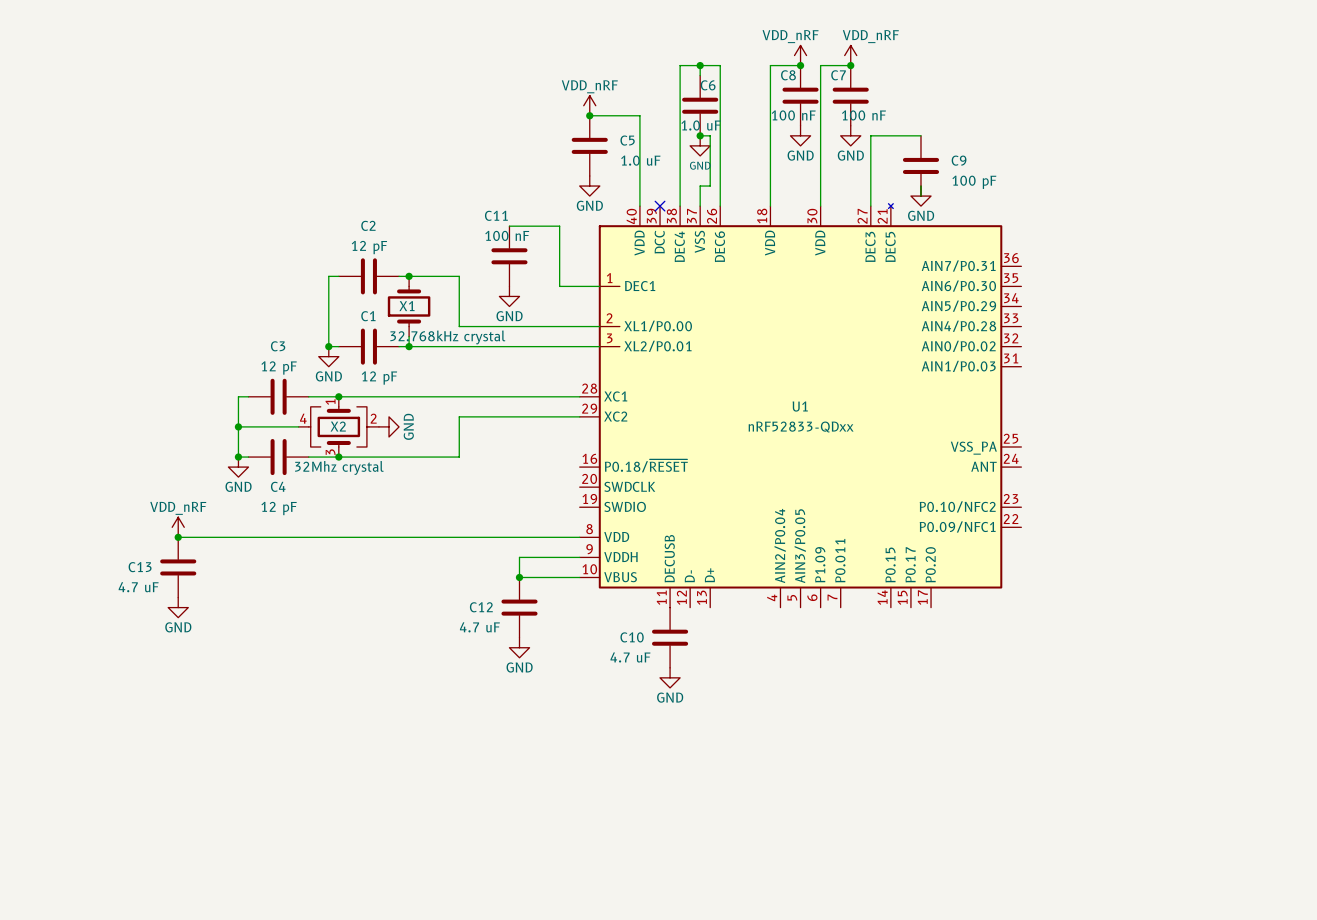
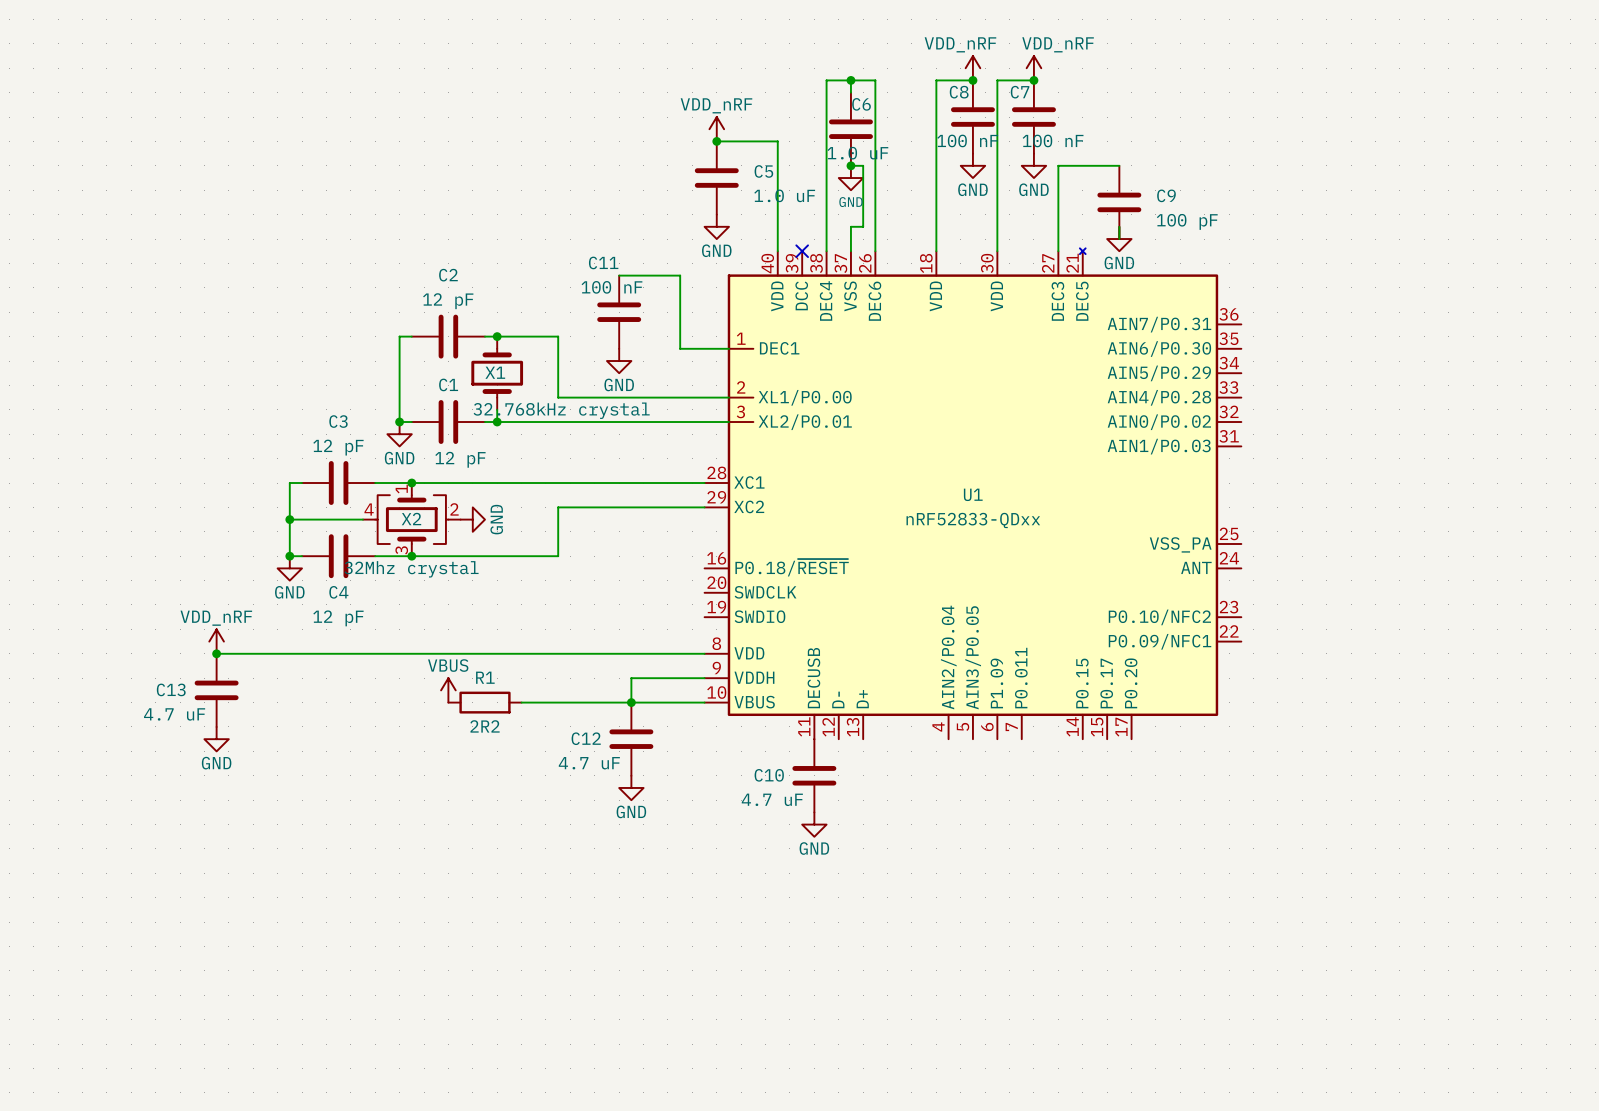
power symbol: none -> VBUS (448, 690)
R1: none -> 2R2 (484, 702)
wire: none -> (521, 702) (631, 702)

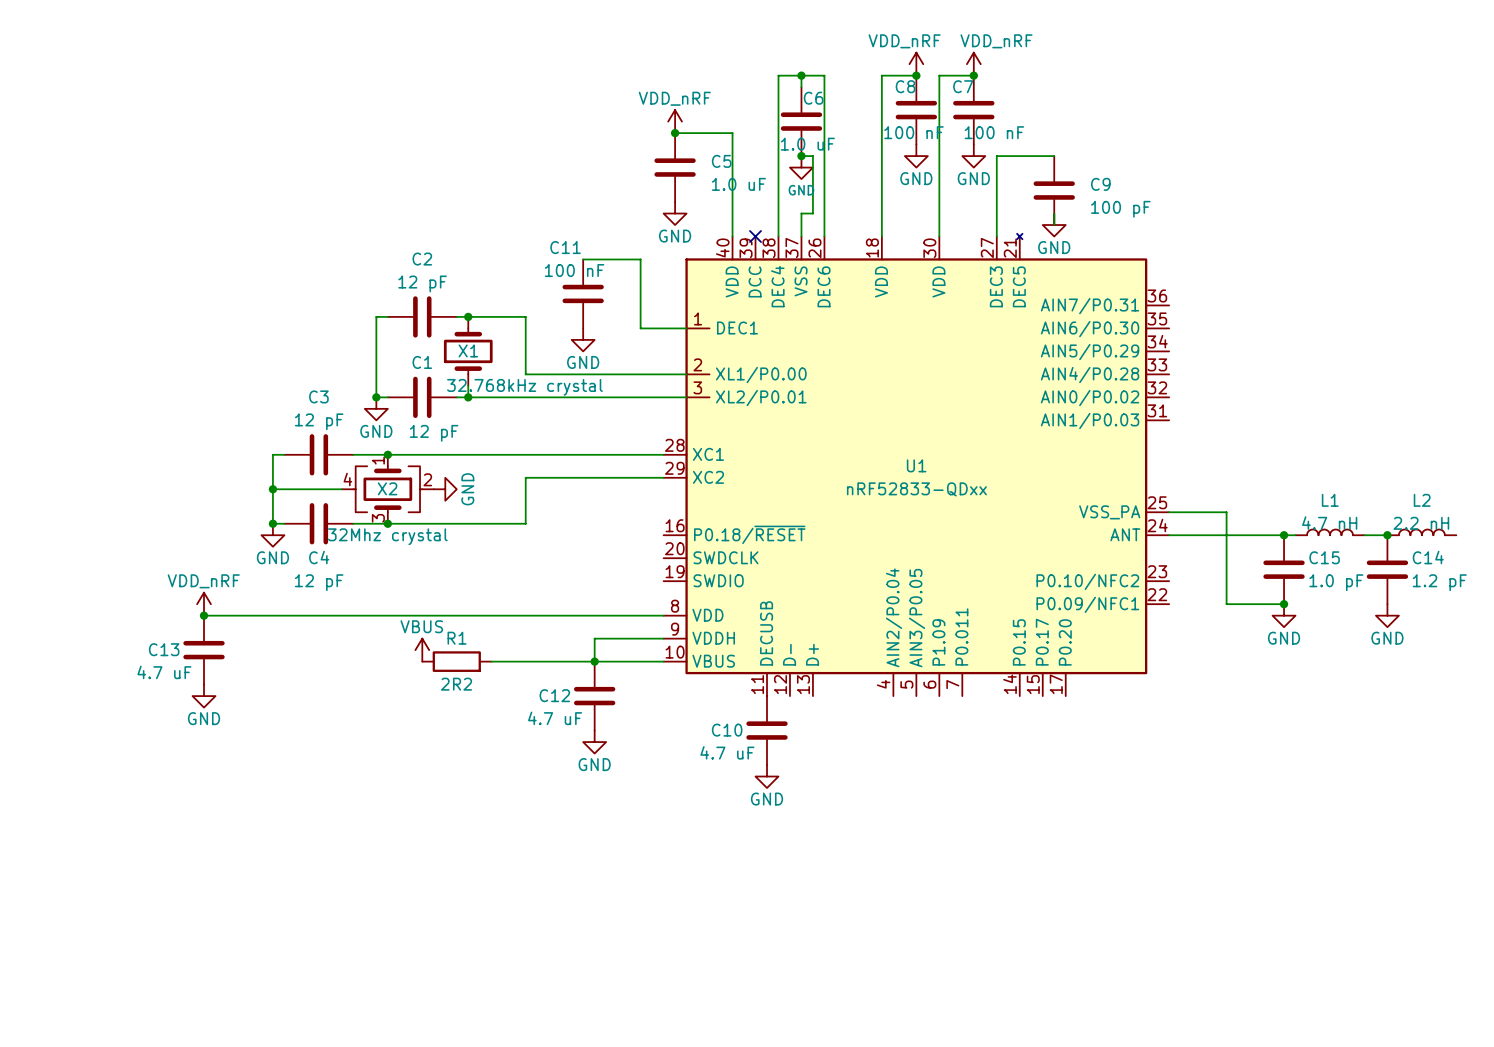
wire: none -> (1169, 512) (1226, 512) (1226, 604) (1284, 604)
L1: none -> 4.7 nH (1329, 532)
L2: none -> 2.2 nH (1421, 532)
wire: none -> (1169, 535) (1295, 535)
junction: none -> (1284, 535)
wire: none -> (1364, 535) (1387, 535)
junction: none -> (1387, 535)
C15: none -> 1.0 pF (1284, 569)
C14: none -> 1.2 pF (1387, 569)
junction: none -> (1284, 604)
power symbol: none -> GND (1284, 615)
power symbol: none -> GND (1387, 615)

